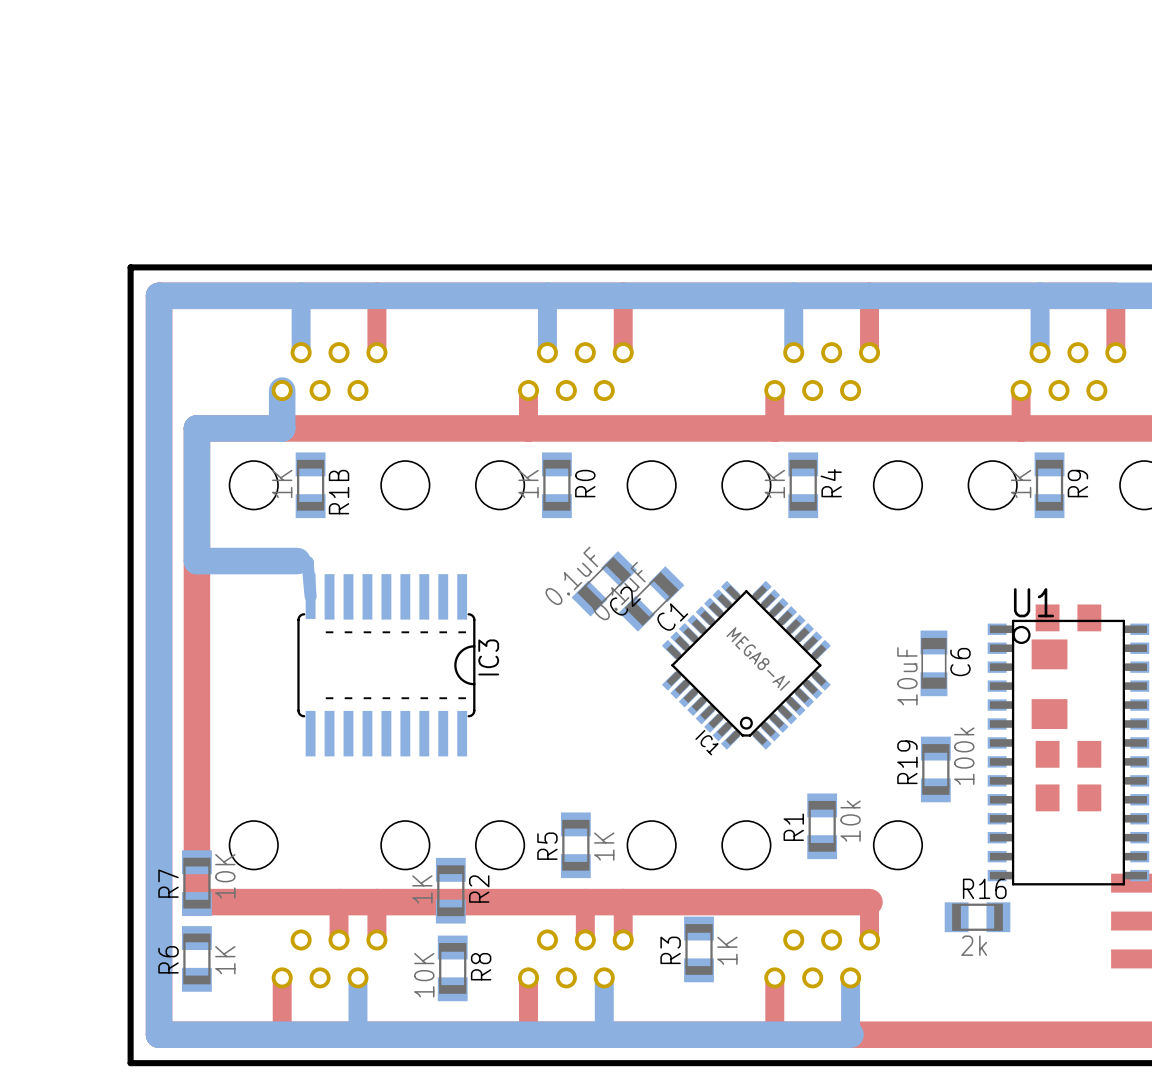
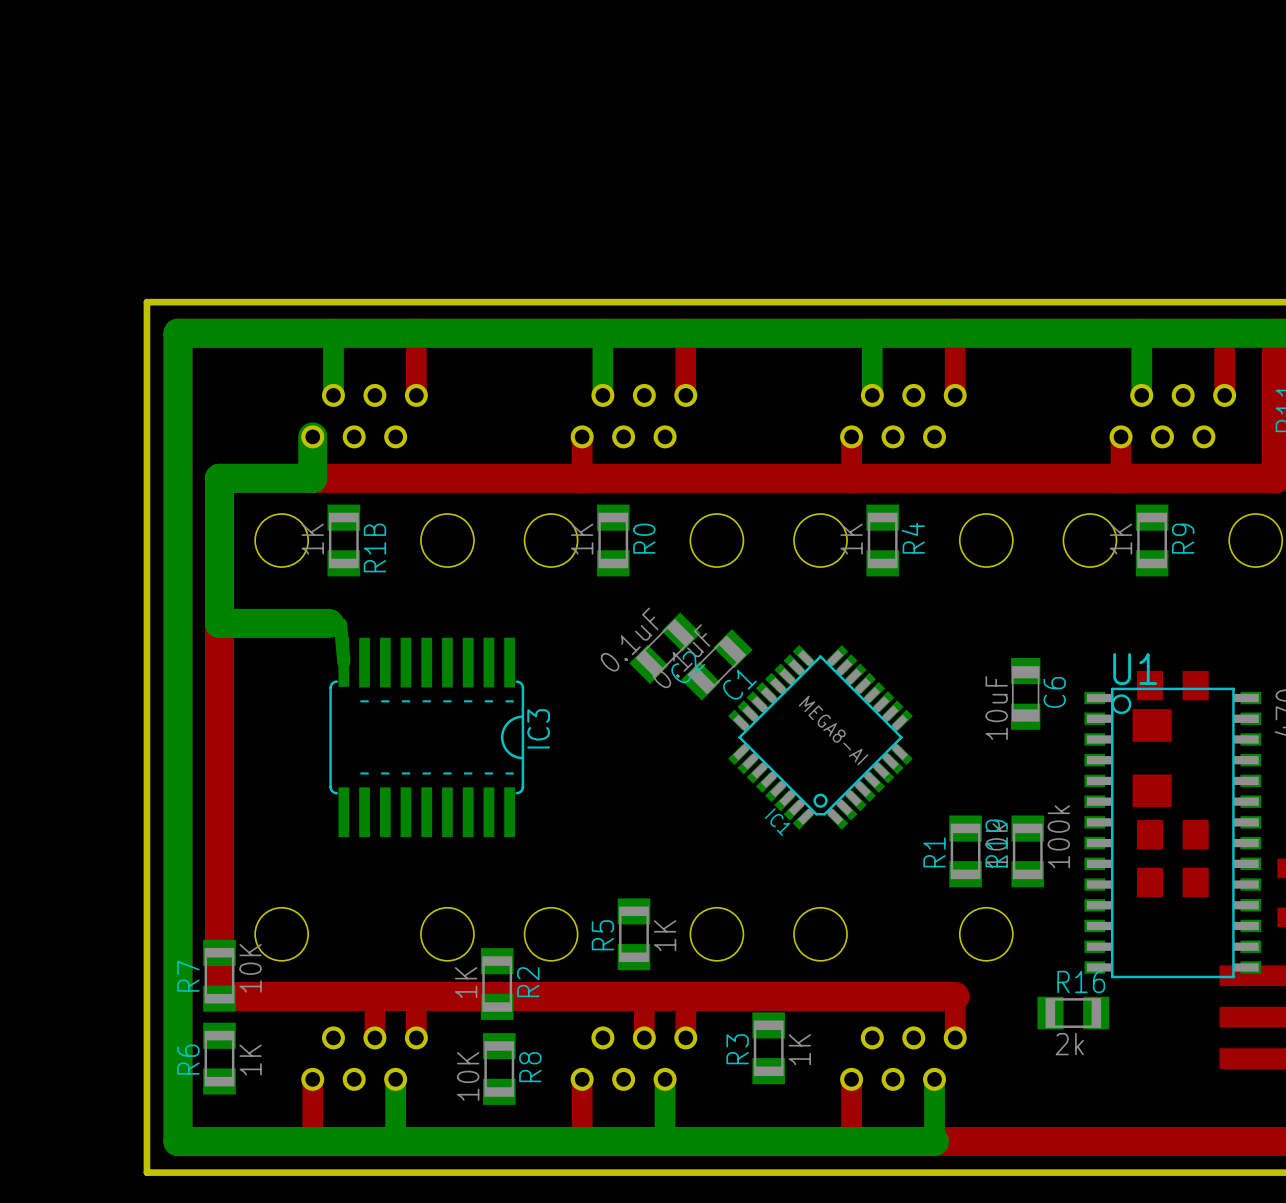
C6 position: (933, 663) -> (1025, 693)
R1 position: (822, 826) -> (965, 851)

